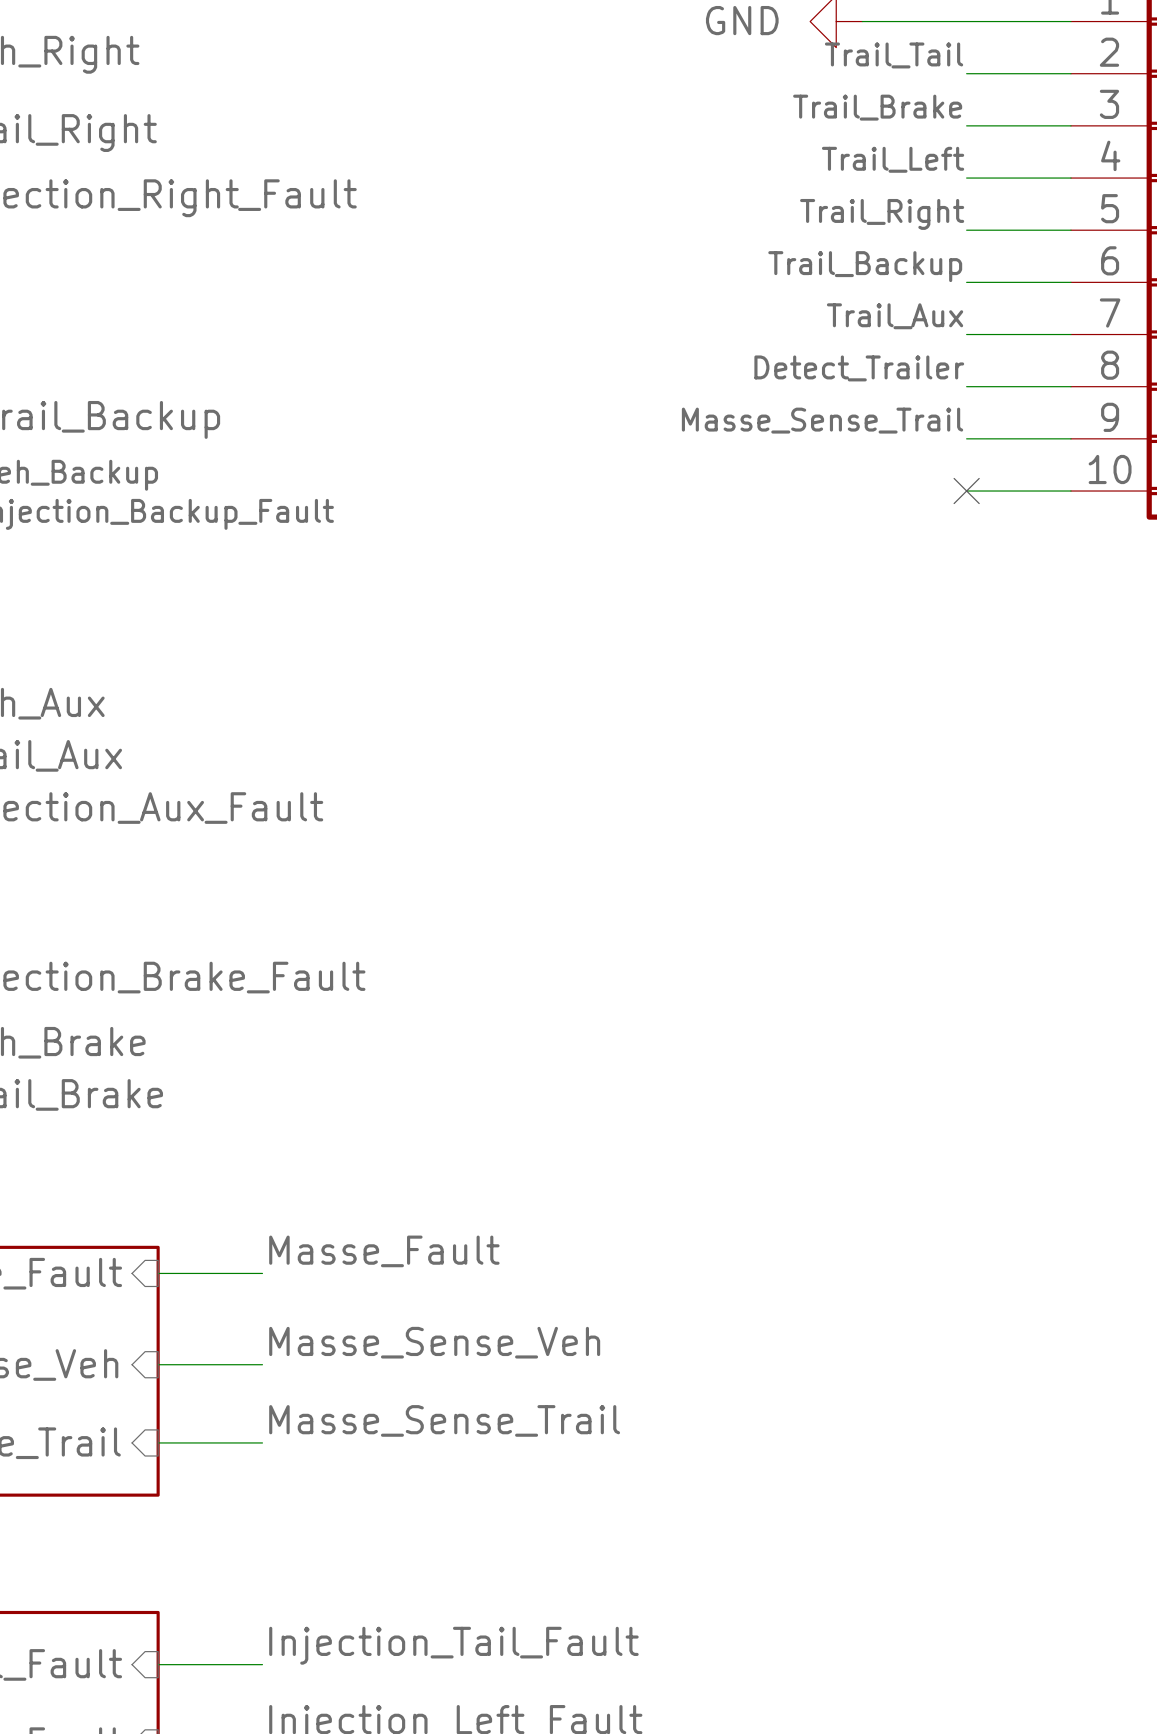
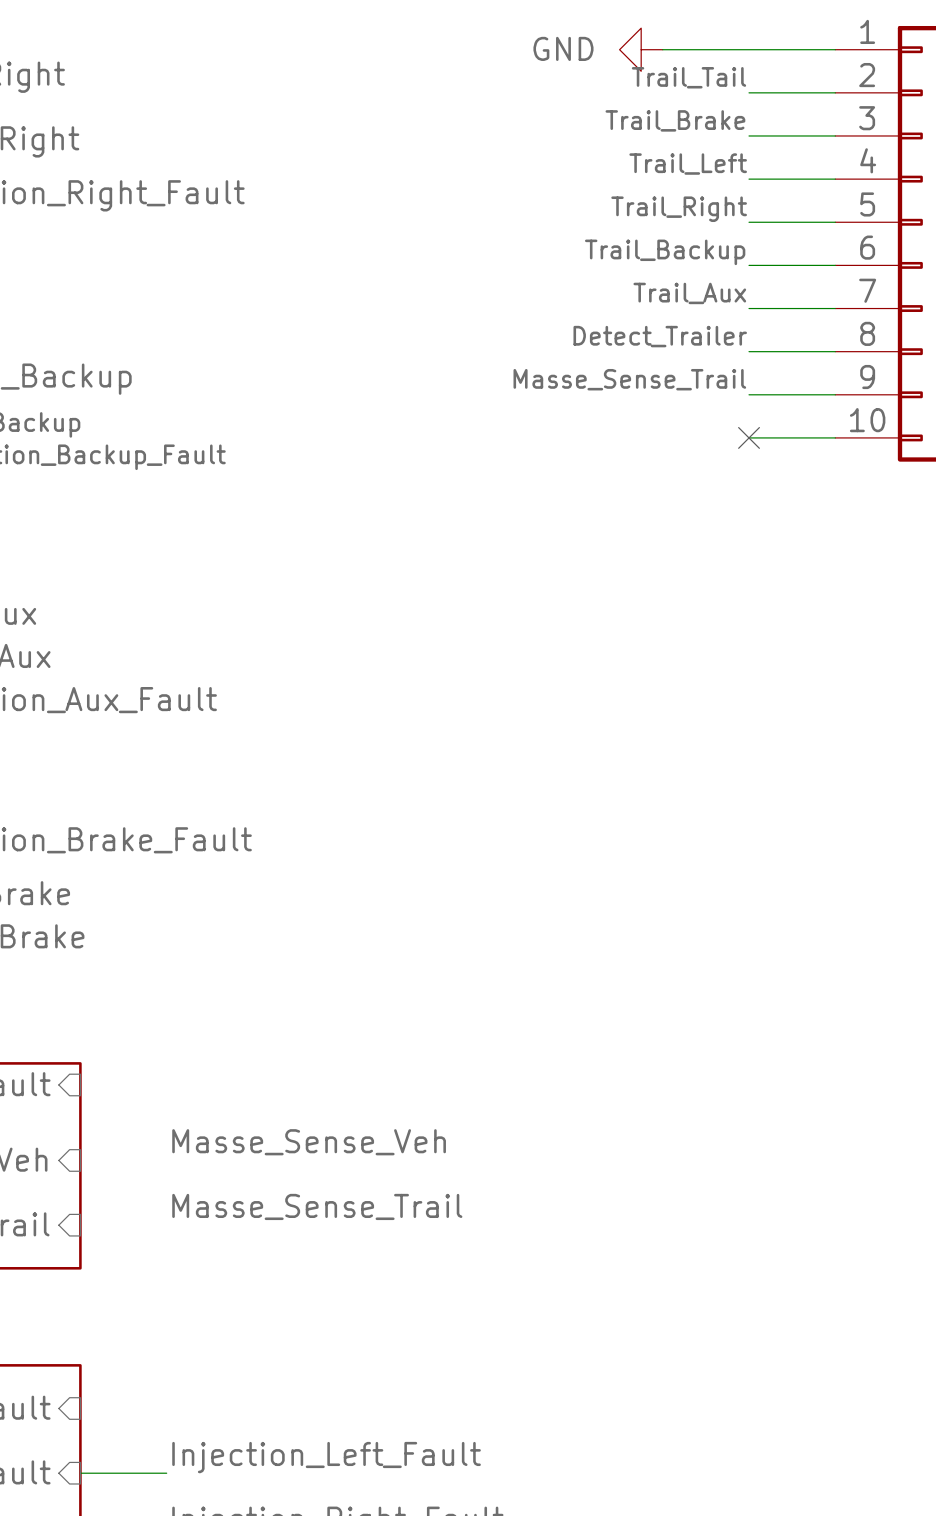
label: Masse_Fault (384, 1251) -> none
wire: (158, 1273) (262, 1273) -> none
wire: (158, 1364) (262, 1364) -> none
wire: (158, 1442) (262, 1442) -> none
label: Injection_Tail_Fault (453, 1645) -> none
wire: (158, 1664) (262, 1664) -> none

